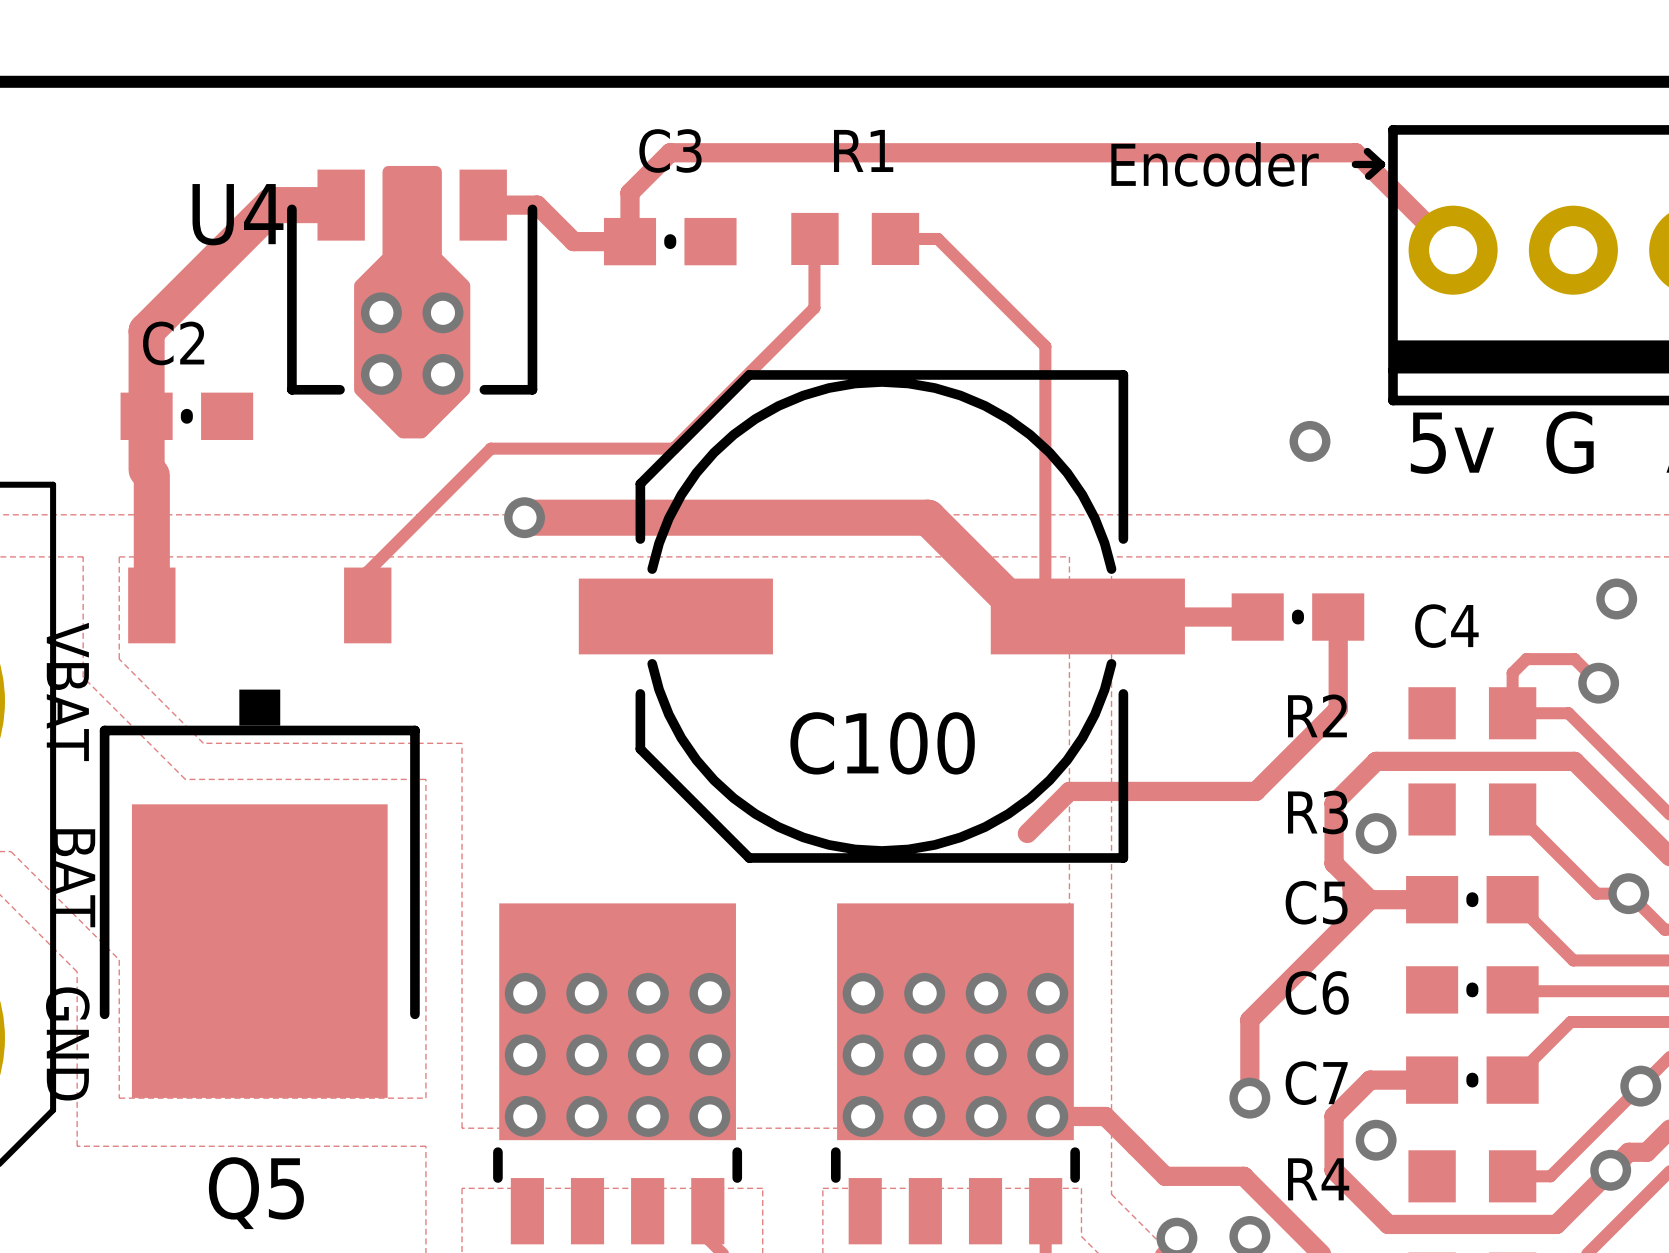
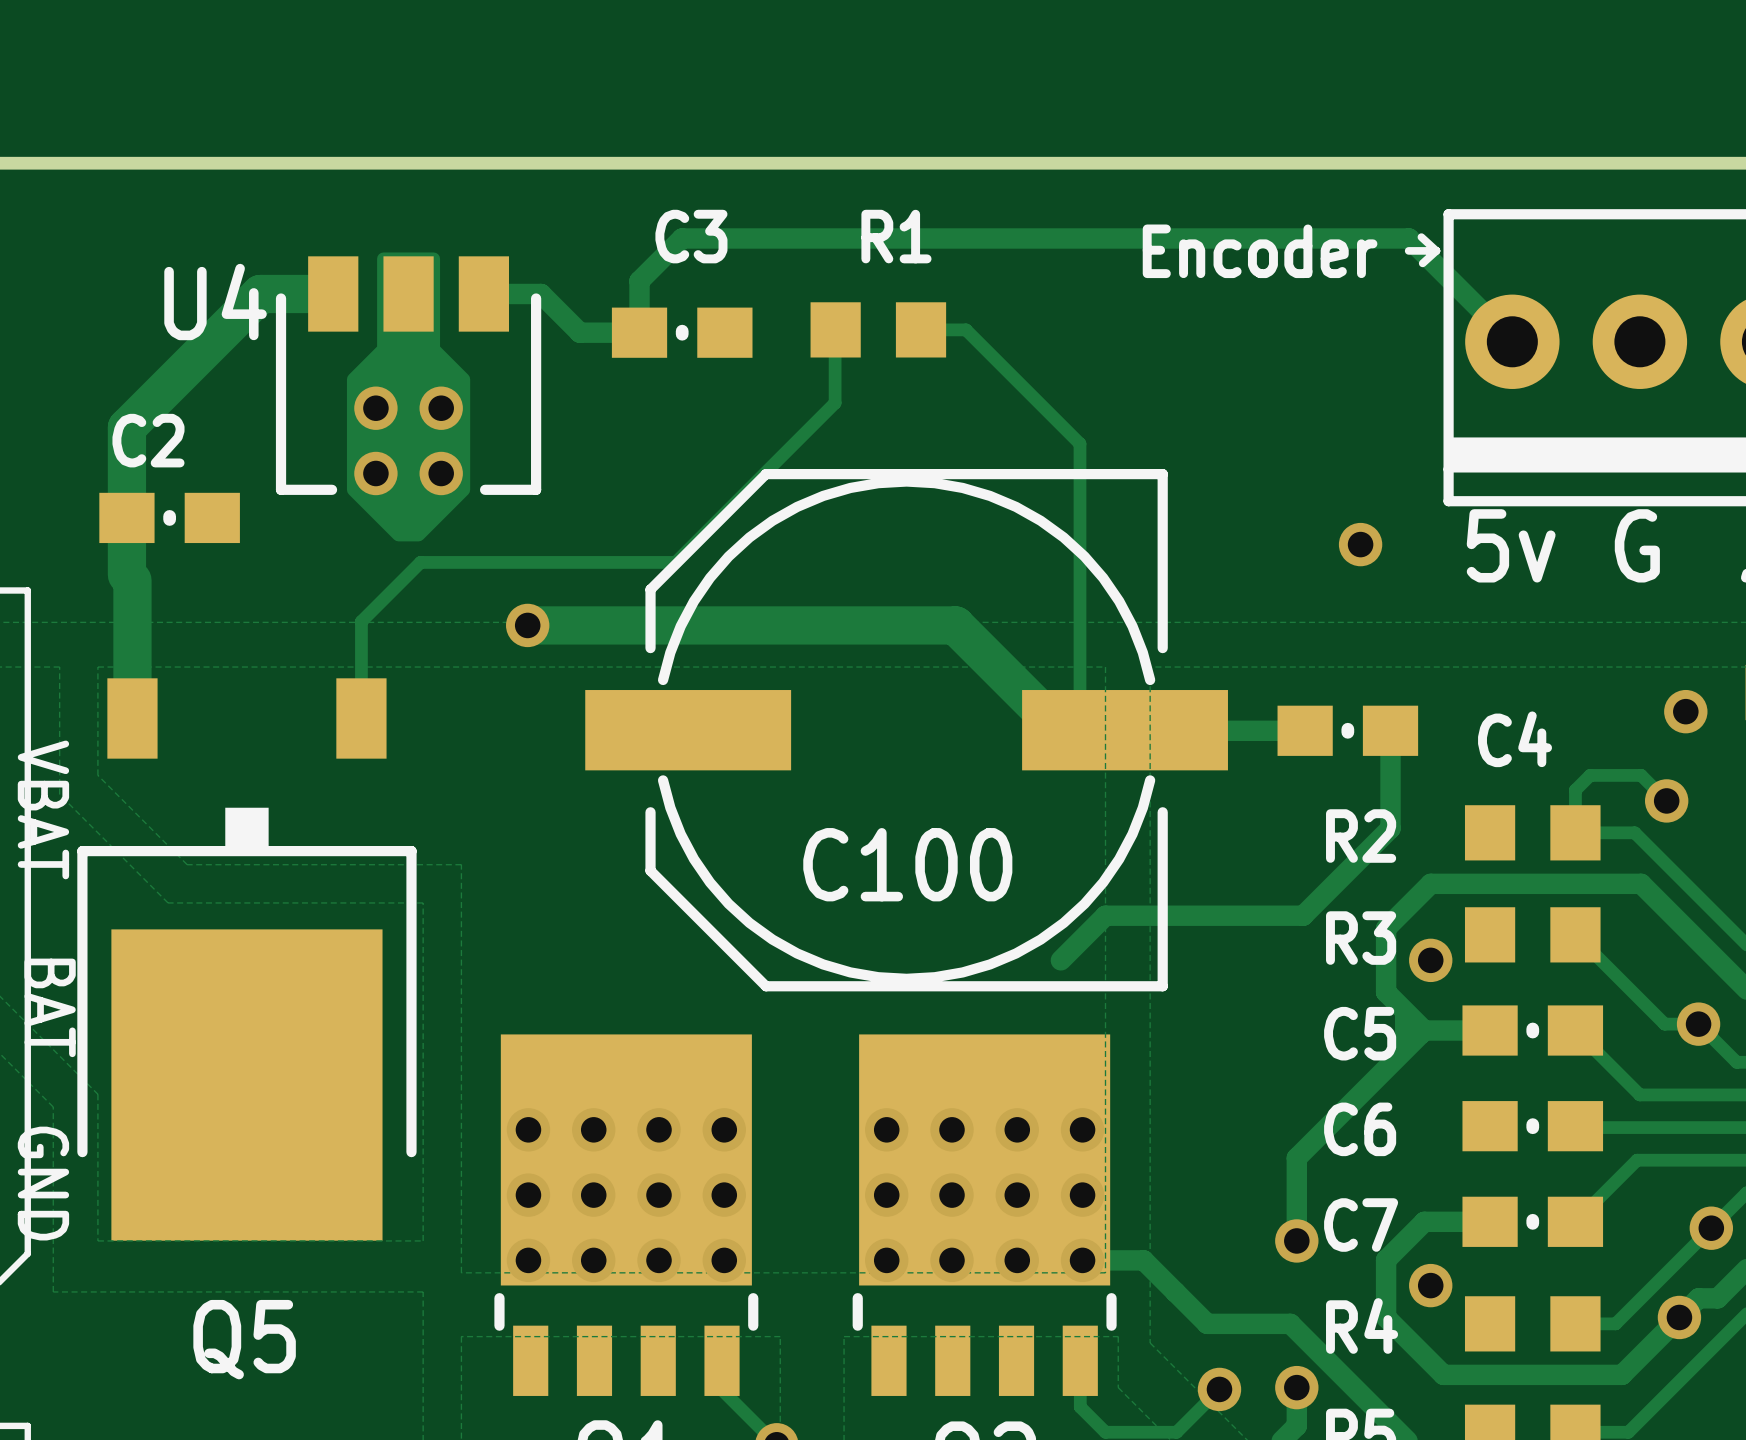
track: (673, 448) (490, 448) (367, 571) -> (685, 552) (675, 562) (420, 562) (361, 621) (361, 682)

